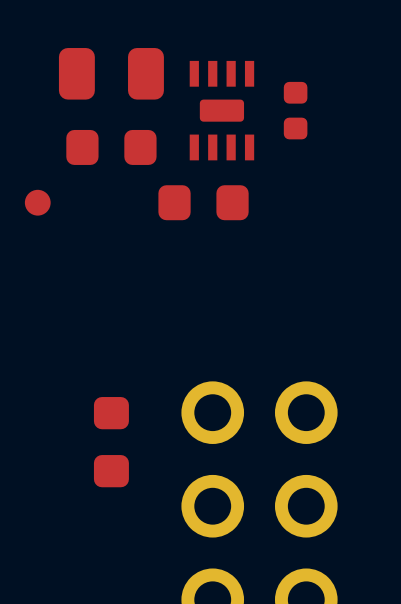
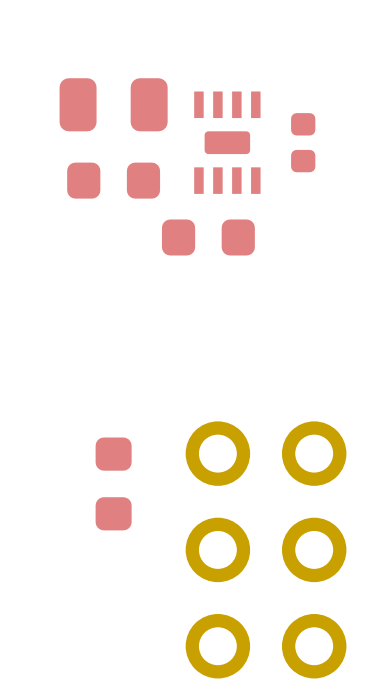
part: (37, 202) -> none

